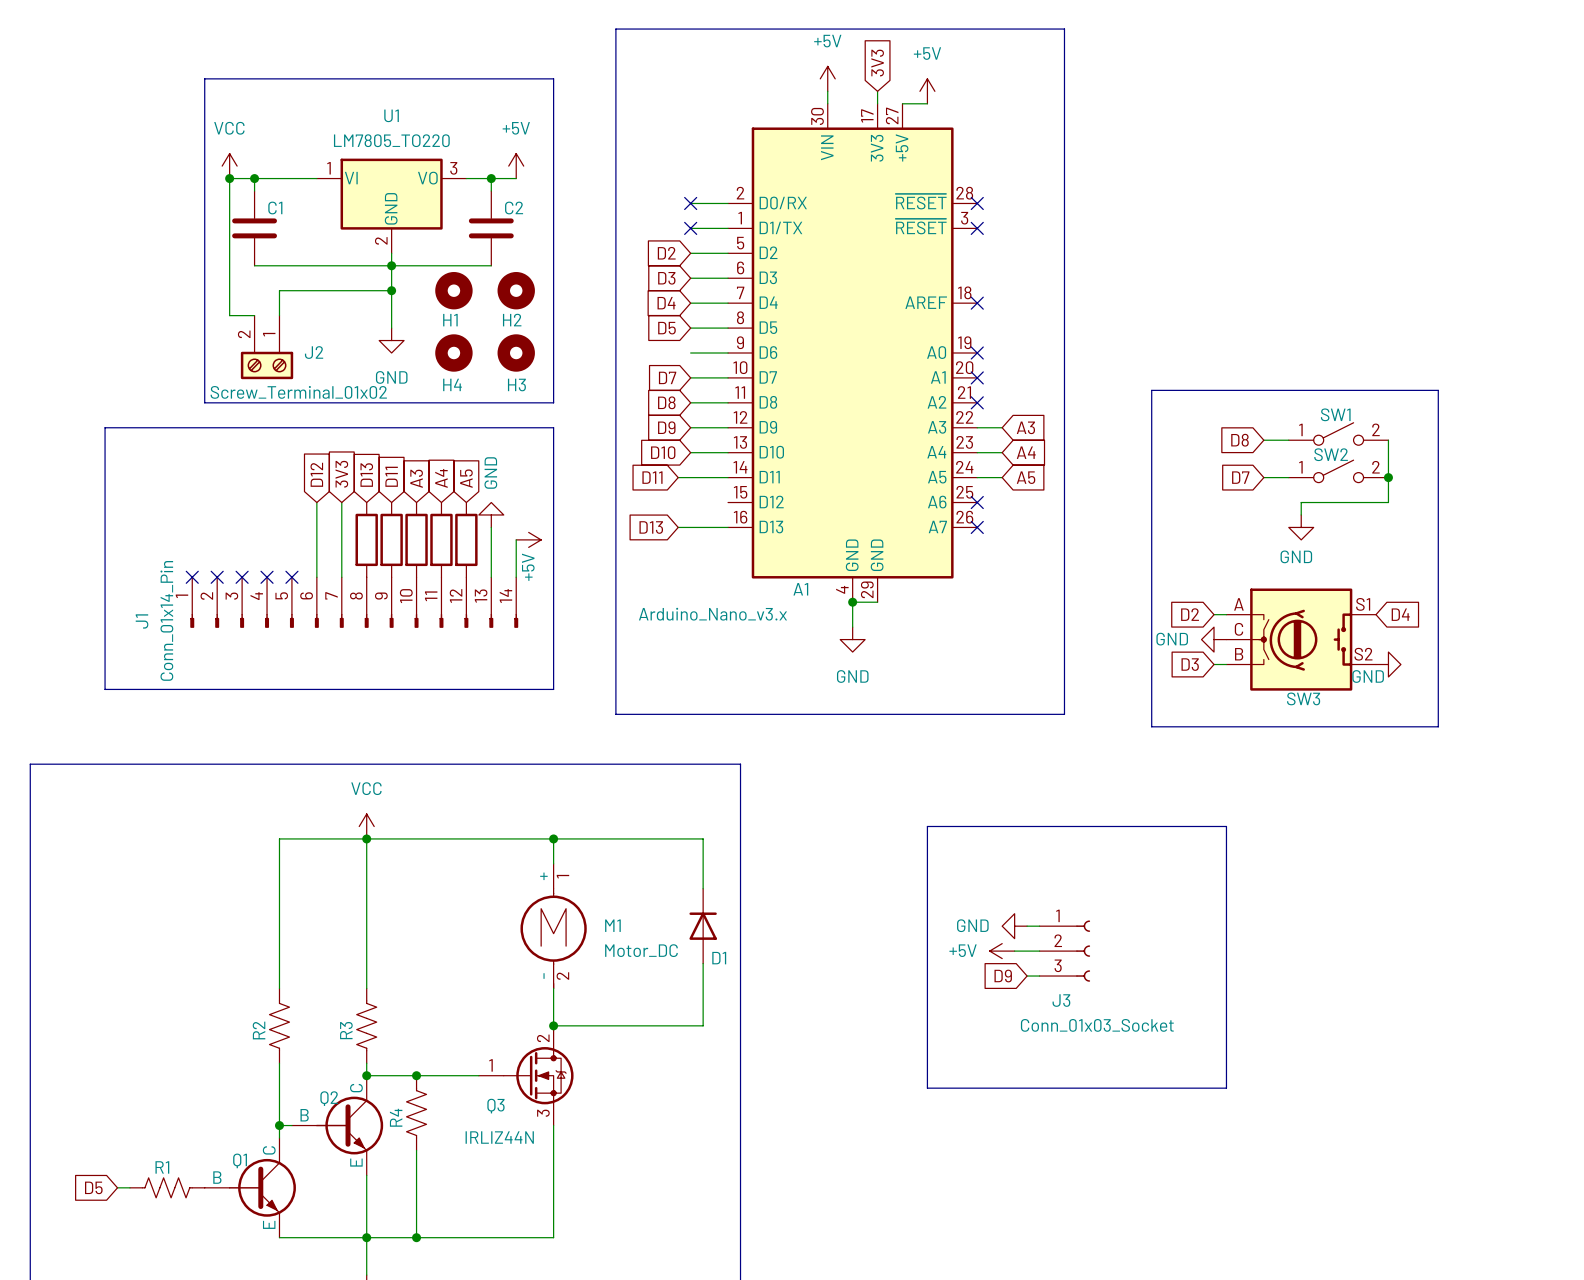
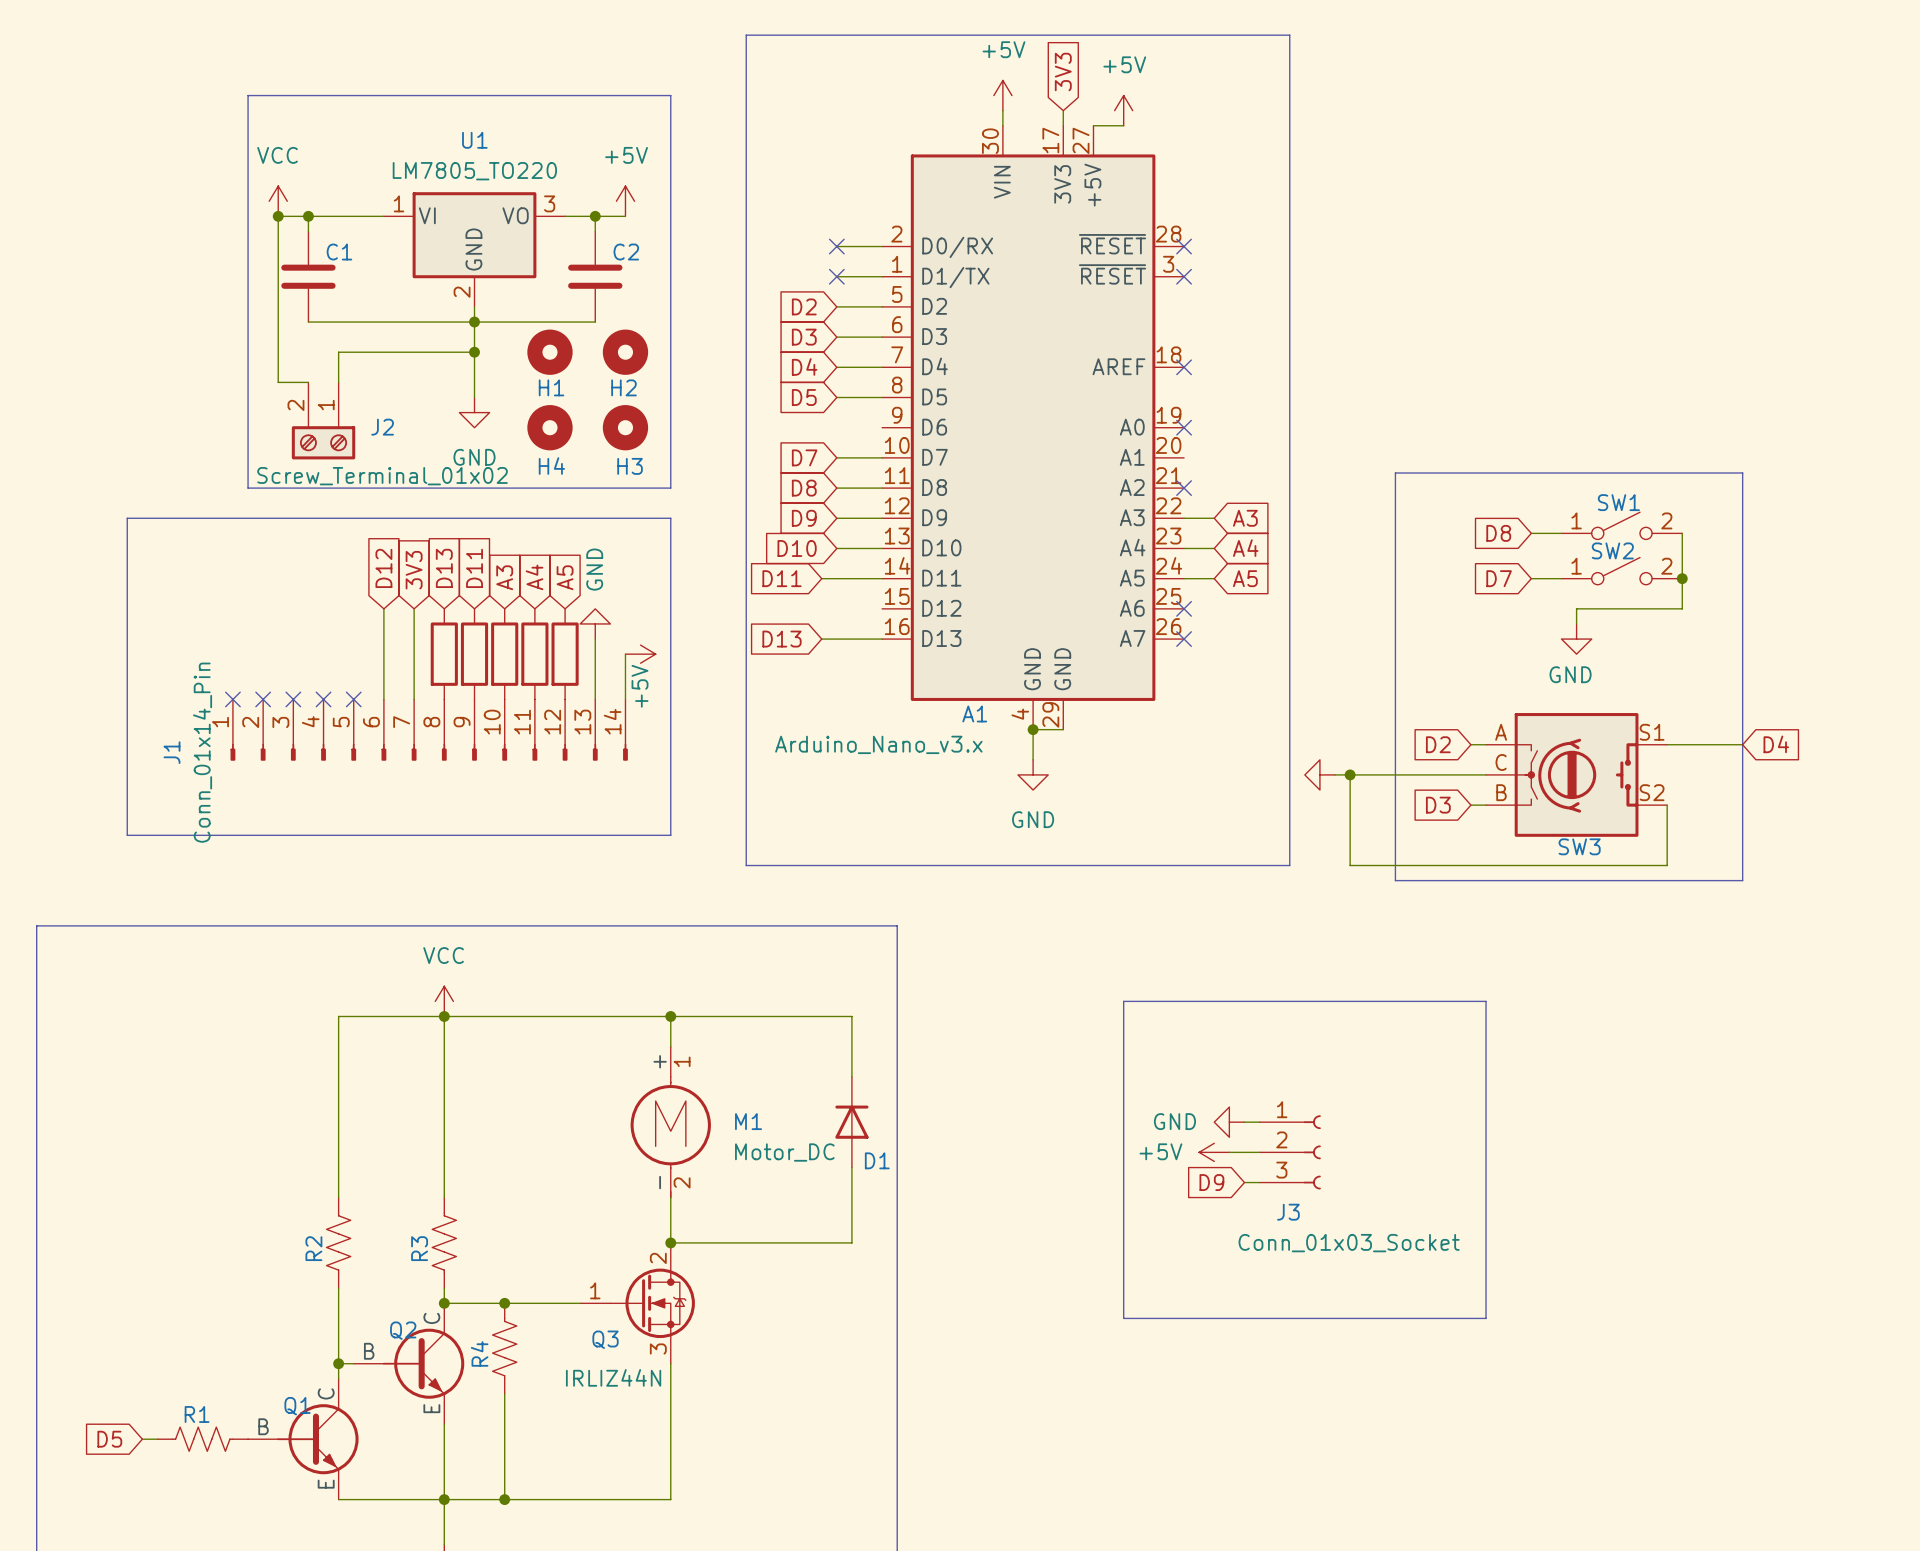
wire: (690, 353) (728, 353) -> none
no-connect mark: (977, 377) -> none
wire: none -> (1667, 744) (1742, 744)
global label position: D4 (1400, 614) -> D4 (1776, 744)
power symbol: none -> (1319, 774)
wire: none -> (1335, 774) (1486, 774)
wire: none -> (1350, 774) (1350, 865) (1667, 865) (1667, 805)
junction: none -> (1350, 774)
power symbol: GND (1214, 639) -> none
power symbol: GND (1388, 664) -> none

